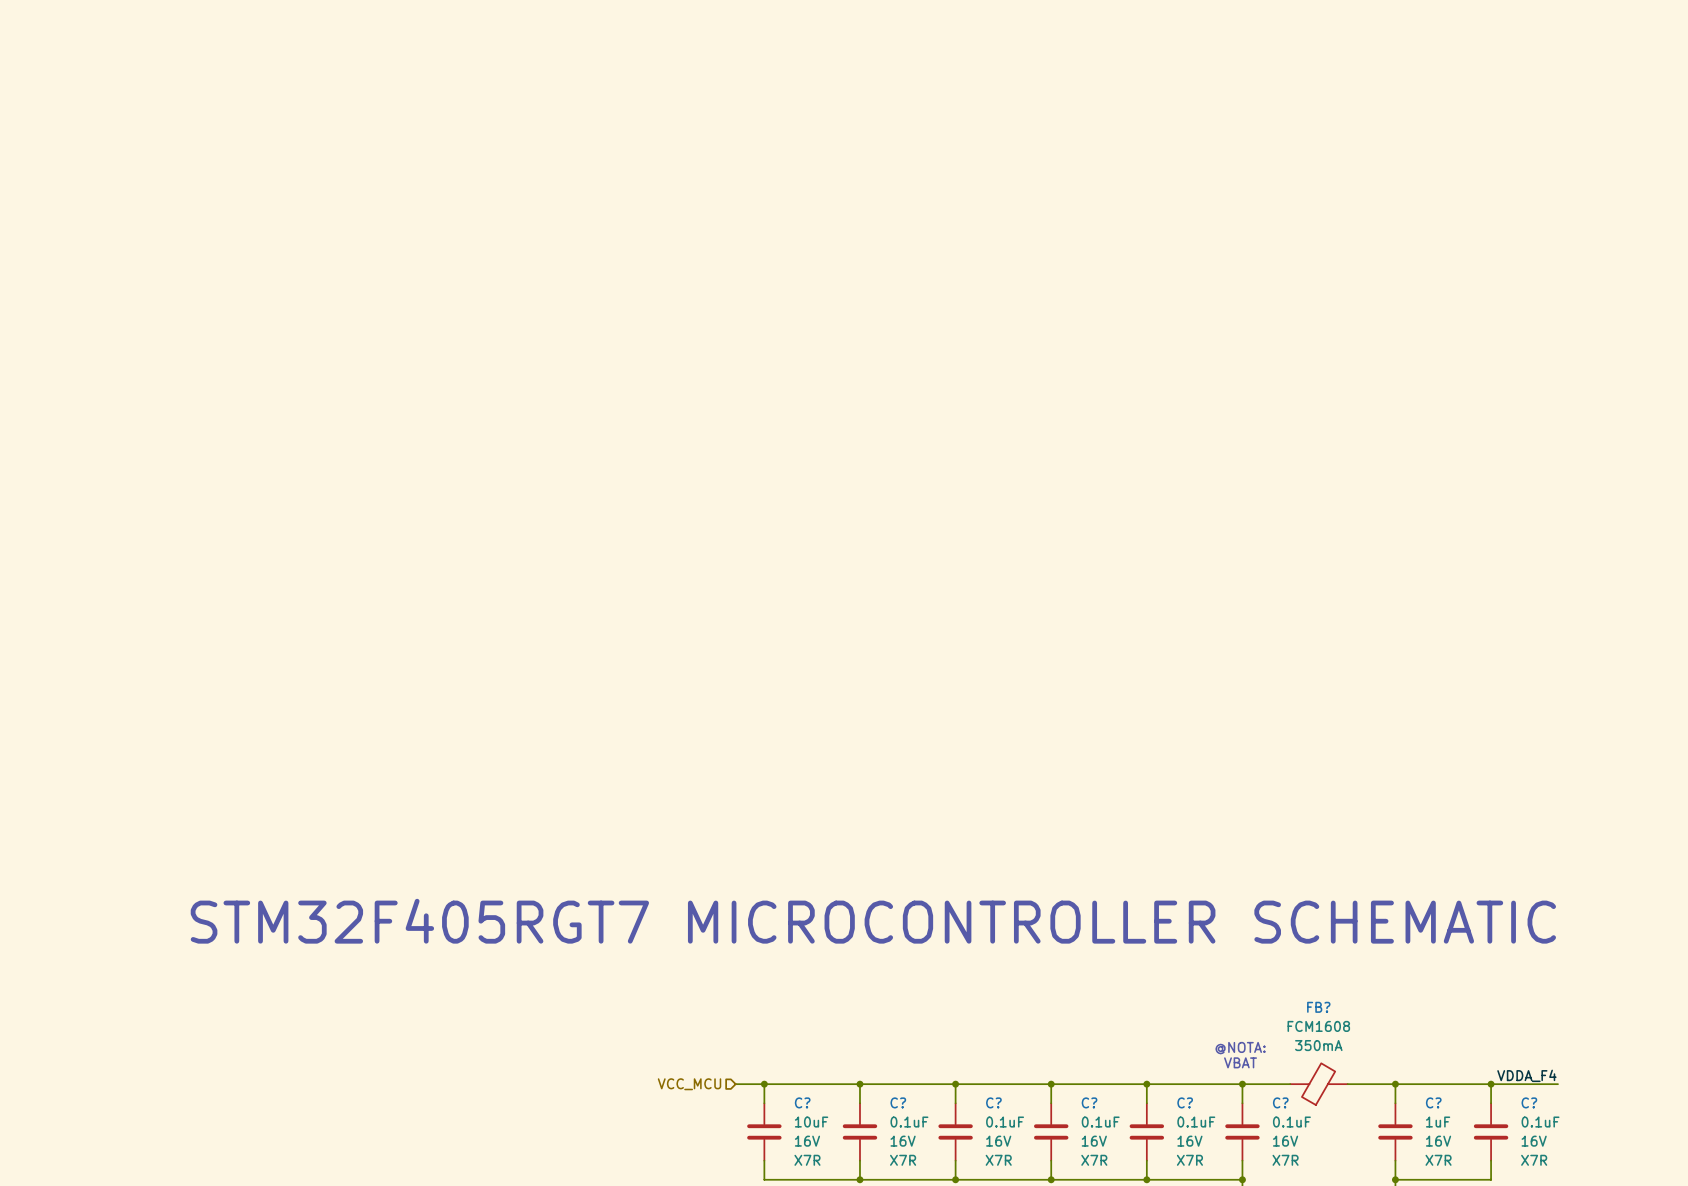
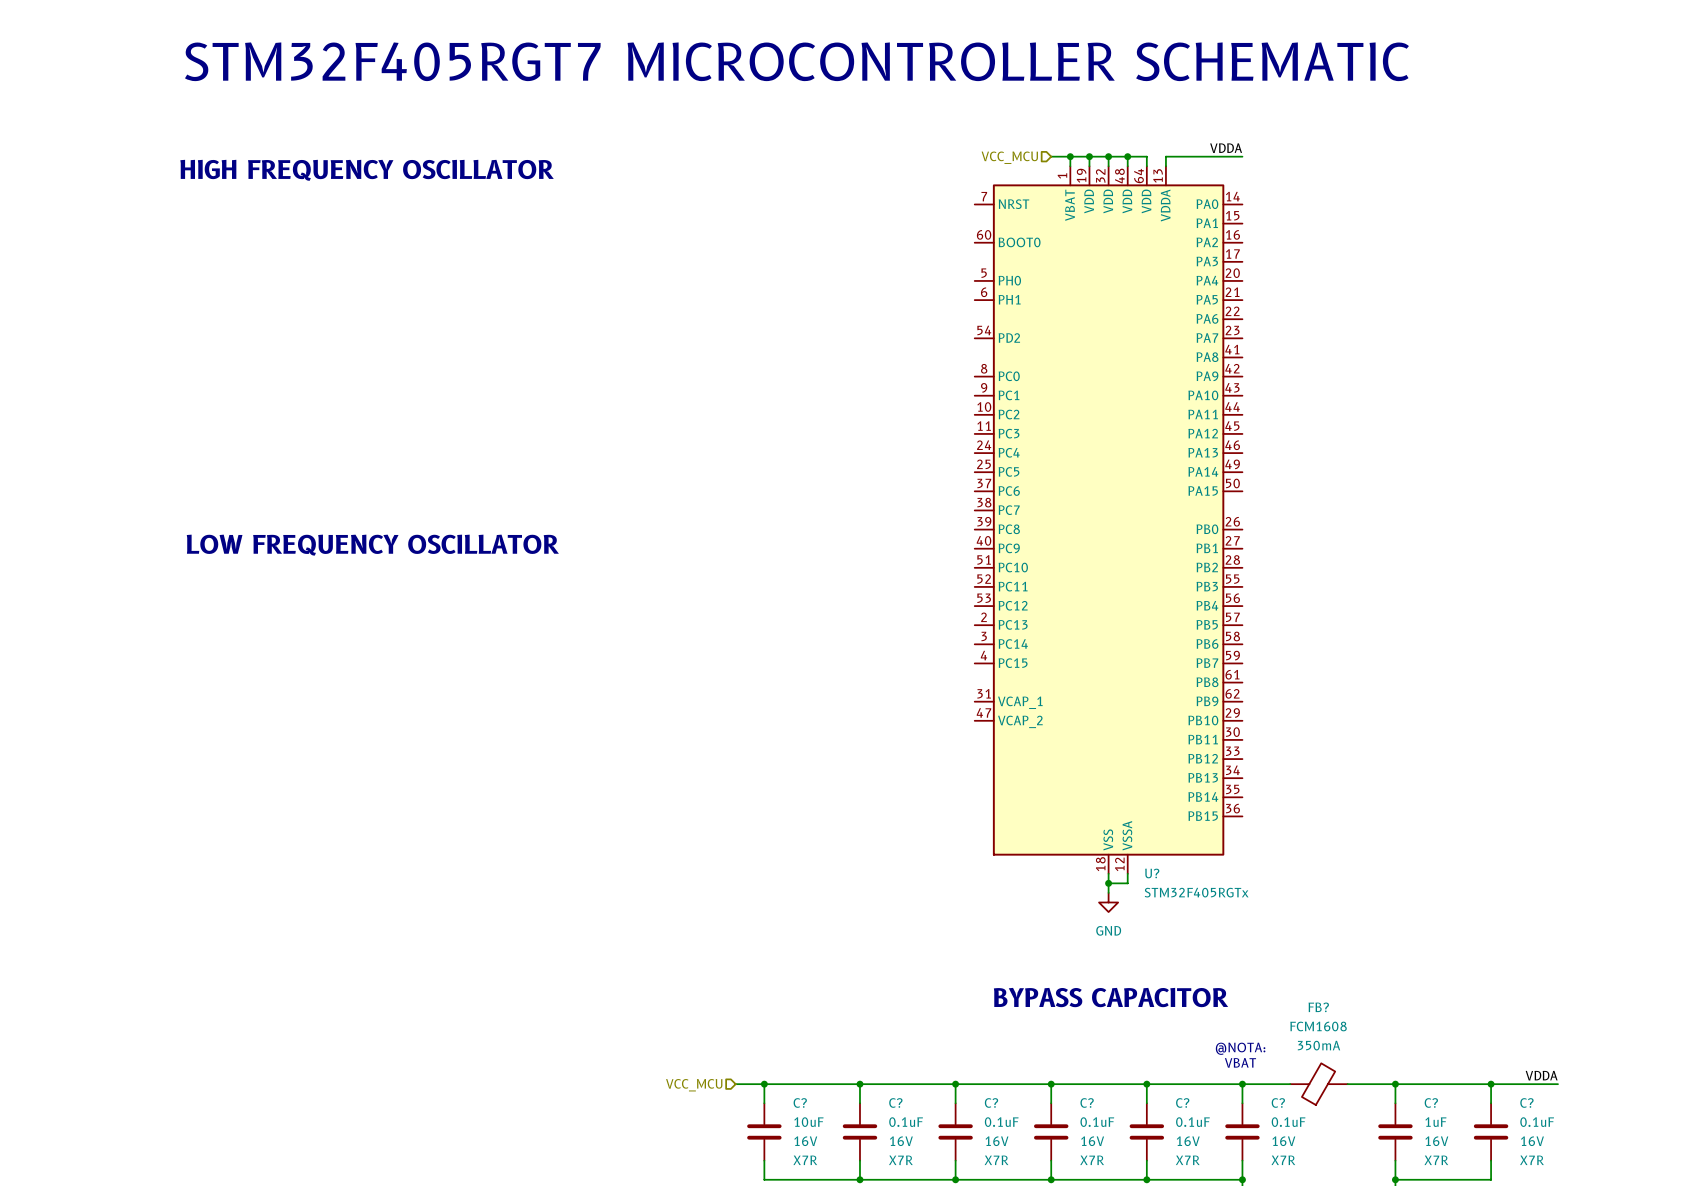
text: none -> STM32F405RGT7 MICROCONTROLLER SCHEMATIC (796, 61)
label: none -> VDDA (1226, 148)
hierarchical label: none -> VCC_MCU (1009, 157)
wire: none -> (1051, 156) (1146, 156) (1146, 166)
wire: none -> (1070, 156) (1070, 166)
junction: none -> (1070, 156)
wire: none -> (1089, 156) (1089, 166)
junction: none -> (1089, 156)
wire: none -> (1108, 156) (1108, 166)
junction: none -> (1108, 156)
wire: none -> (1127, 156) (1127, 166)
junction: none -> (1127, 156)
wire: none -> (1242, 156) (1165, 156) (1165, 166)
text: none -> HIGH FREQUENCY OSCILLATOR (367, 170)
U?: none -> STM32F405RGTx (1108, 520)
text: none -> LOW FREQUENCY OSCILLATOR (372, 545)
wire: none -> (1108, 873) (1108, 892)
wire: none -> (1127, 873) (1127, 883) (1108, 883)
junction: none -> (1108, 883)
power symbol: none -> GND (1108, 902)
text: STM32F405RGT7 MICROCONTROLLER SCHEMATIC (873, 921) -> none
text: none -> BYPASS CAPACITOR (1111, 997)
label: VDDA_F4 (1526, 1075) -> VDDA (1541, 1075)

